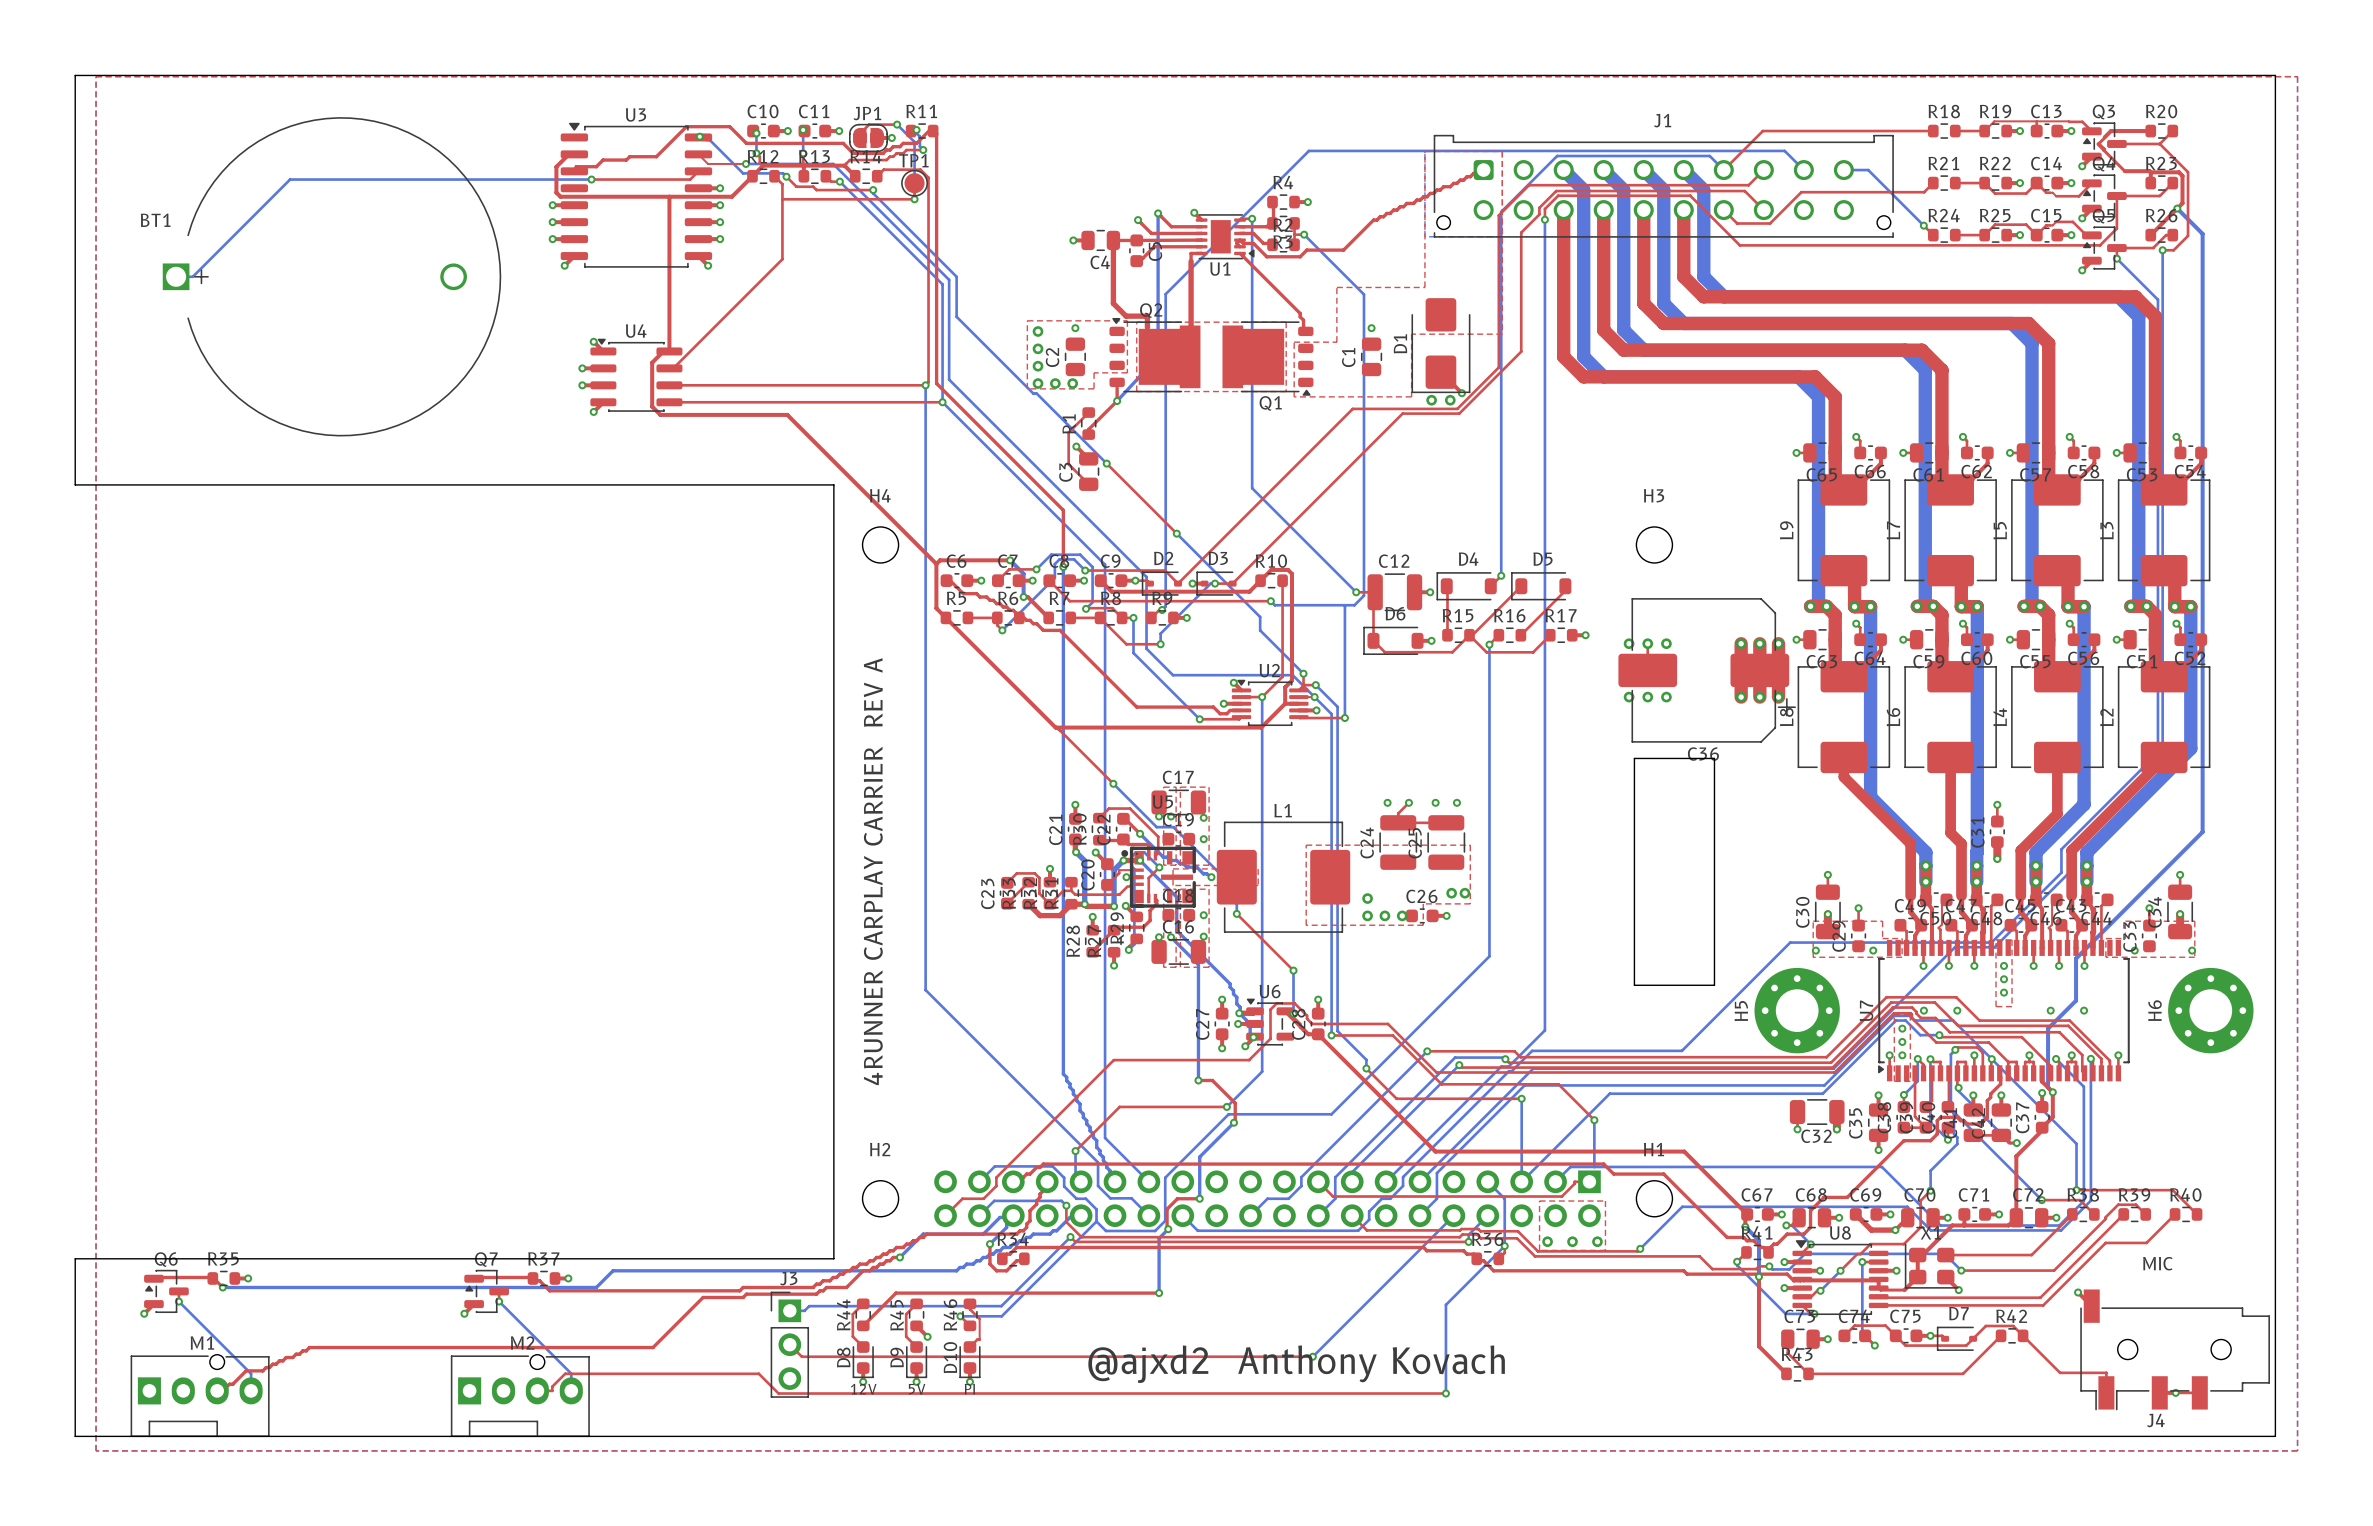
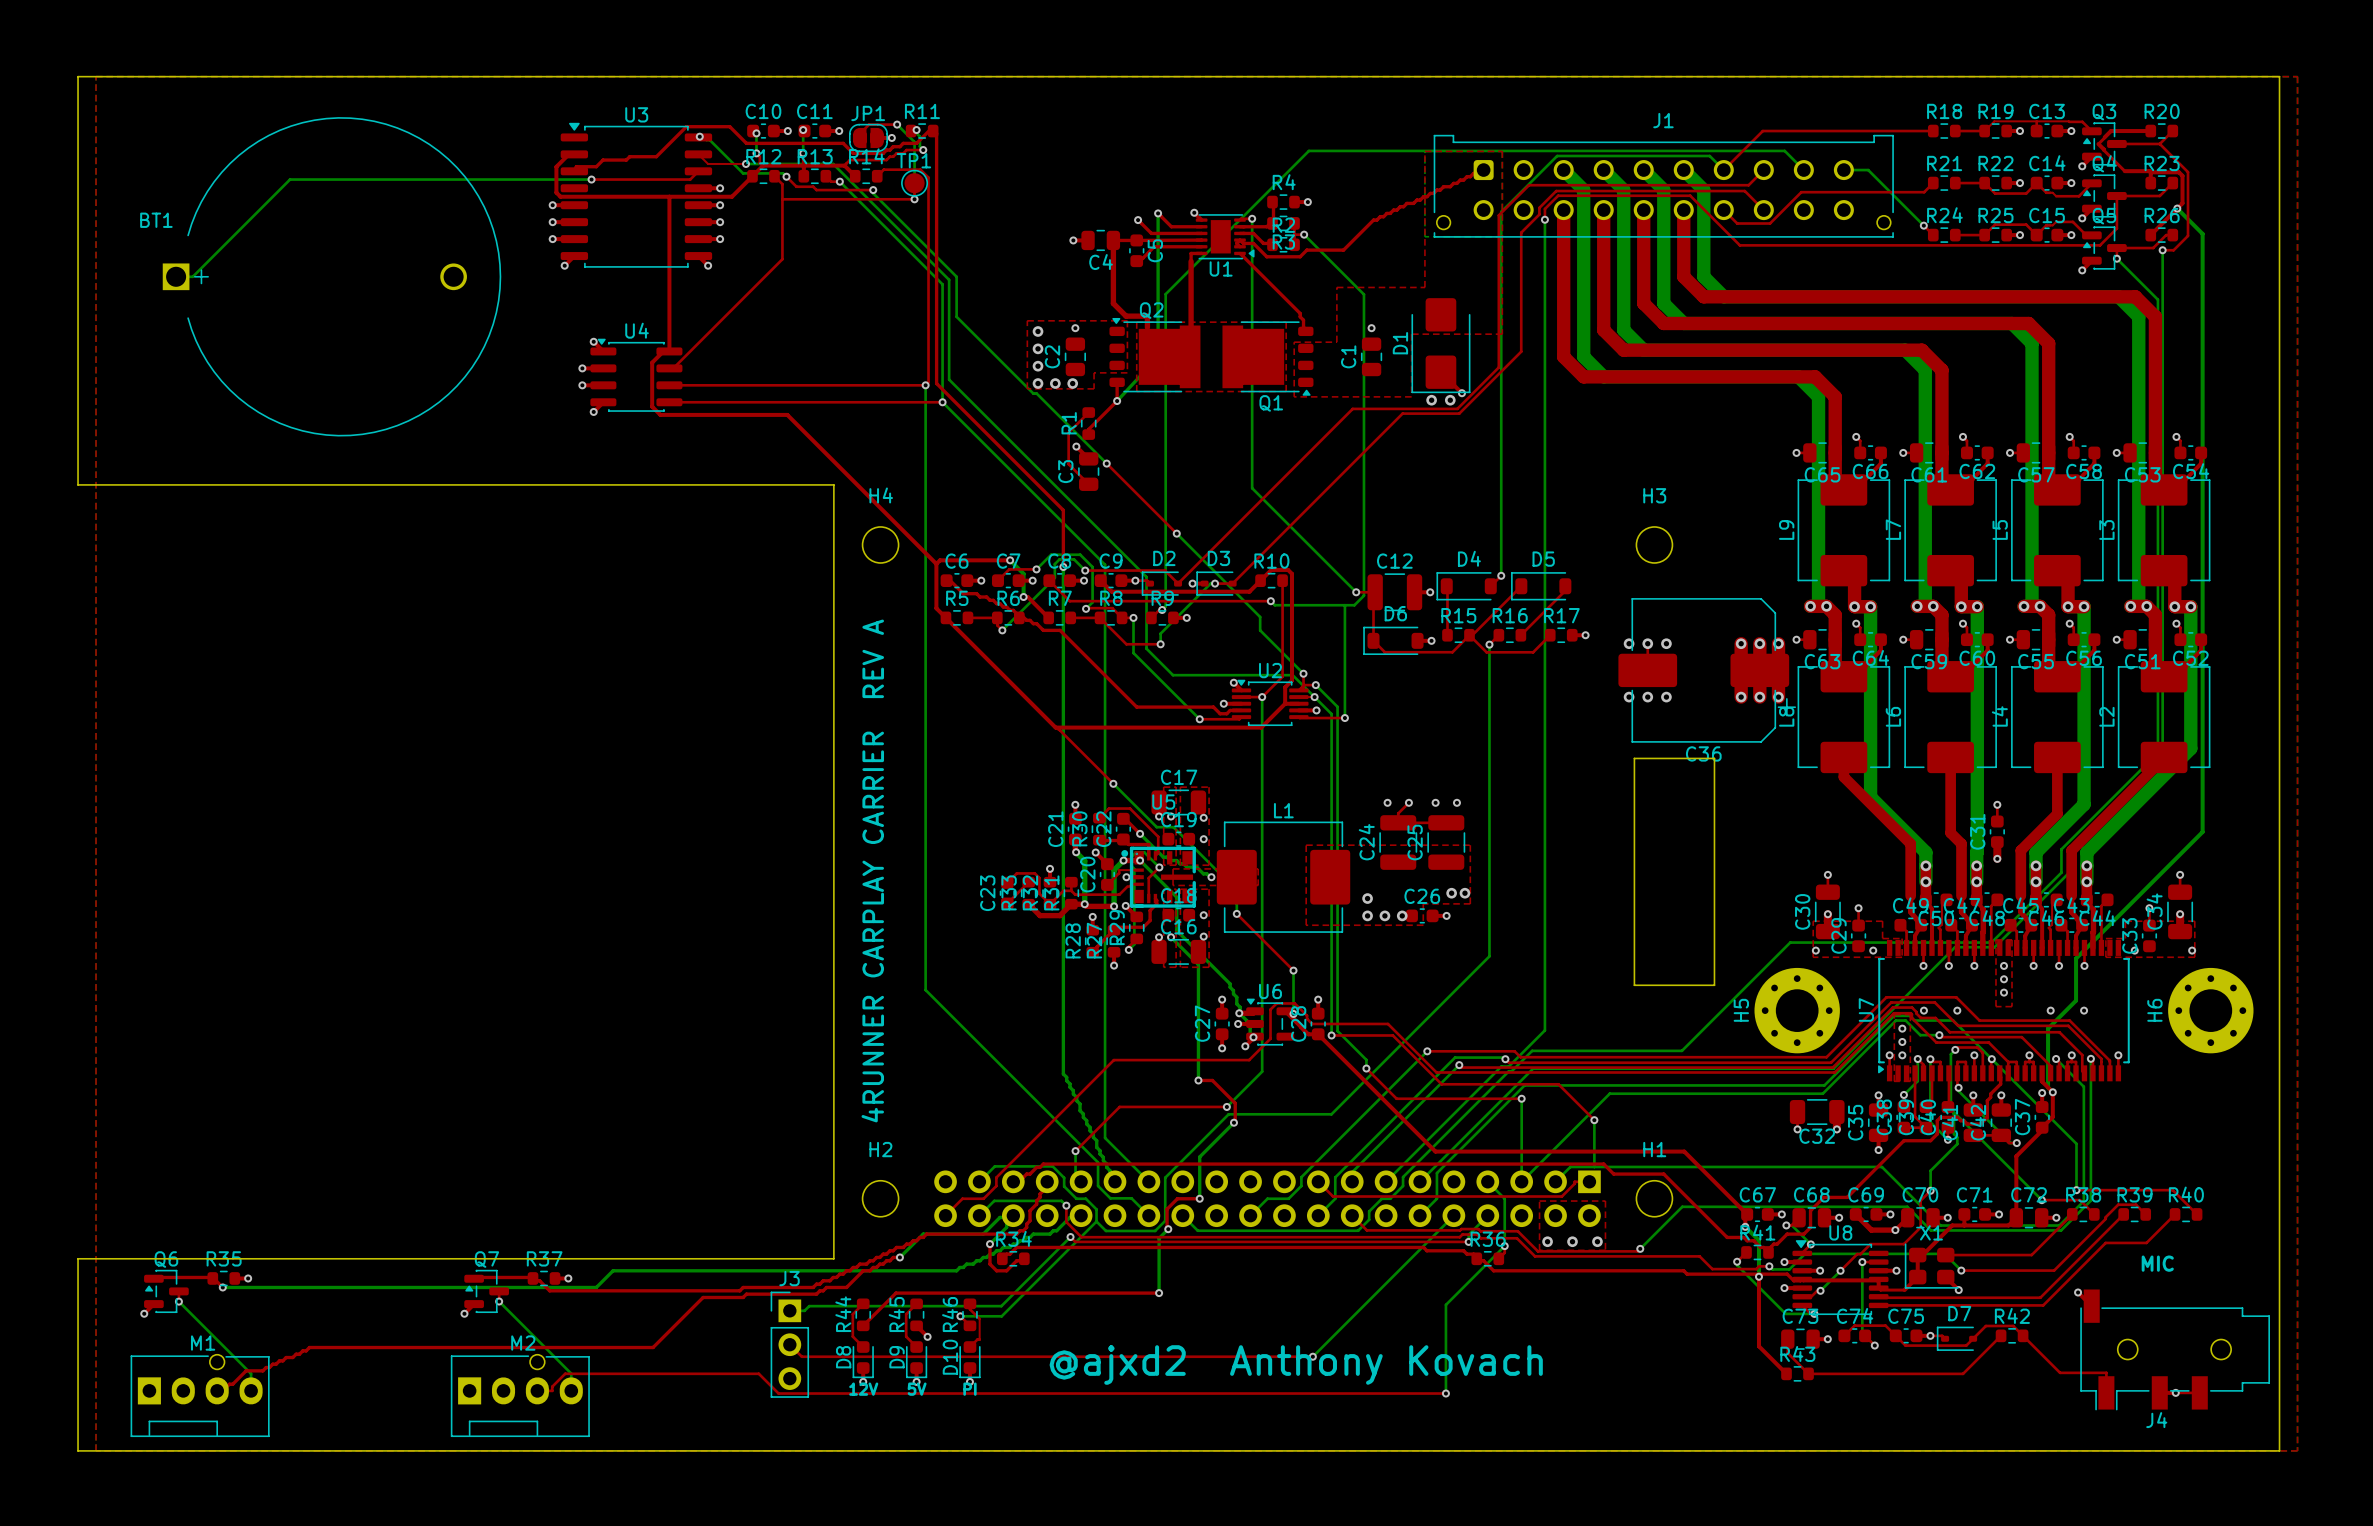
board edge: (78, 484) (75, 484) (75, 75) (2275, 75) (2275, 1436) (75, 1436) (75, 1258) (78, 1258) -> (78, 484) (78, 76) (2279, 76) (2279, 1450) (78, 1450) (78, 1258)

